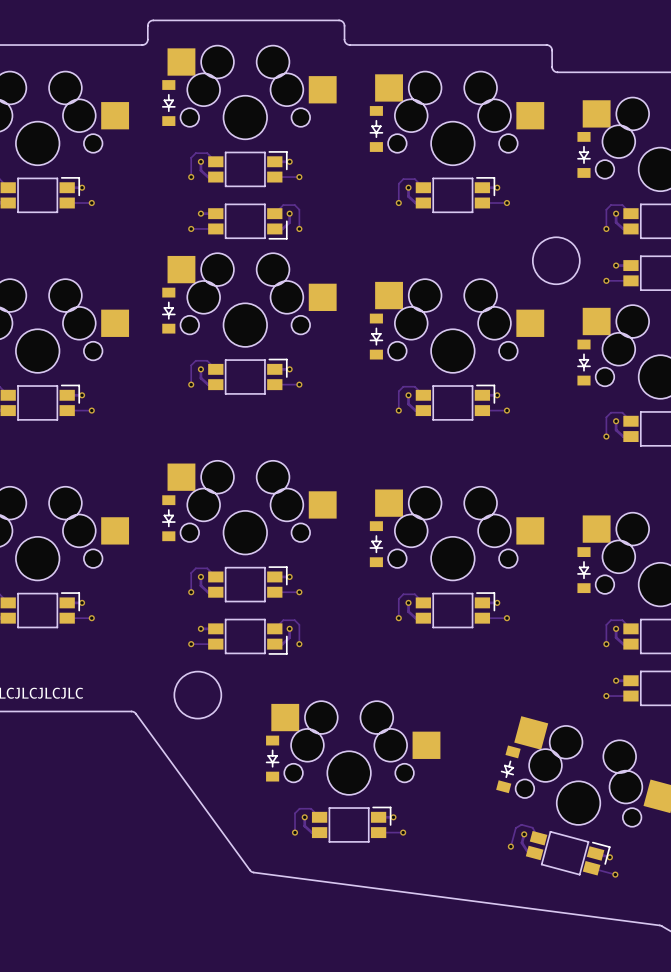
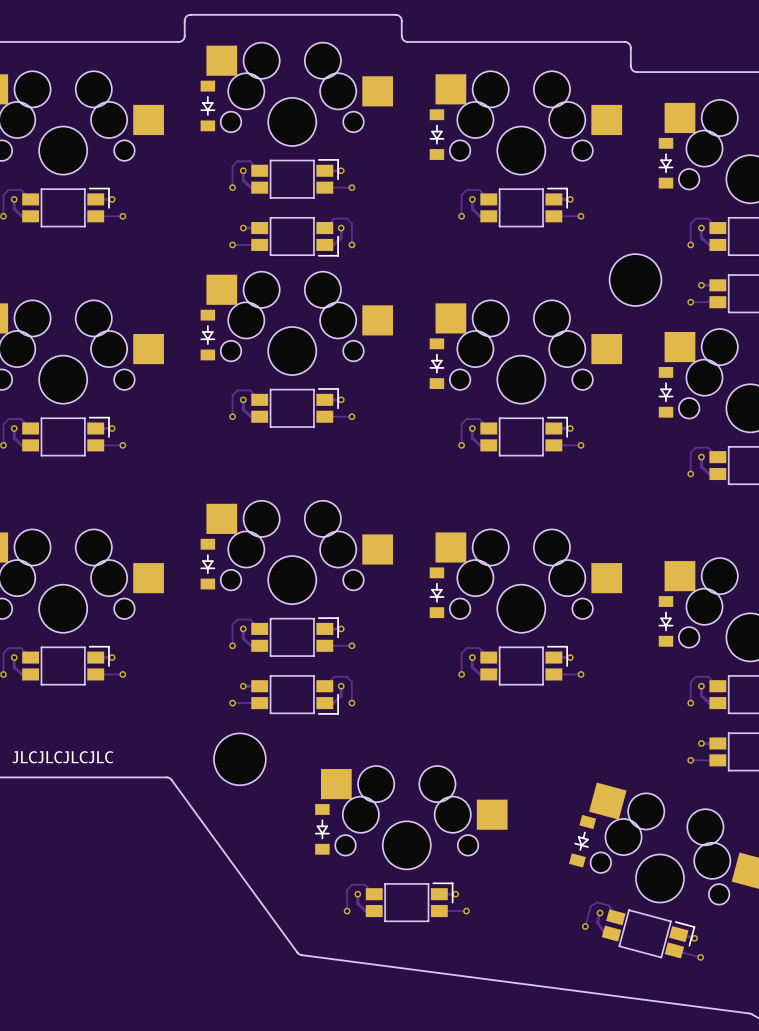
round board edge: [532, 236, 581, 286] -> none
part: none -> (635, 280)
round board edge: [173, 670, 223, 720] -> none
part: none -> (239, 759)

